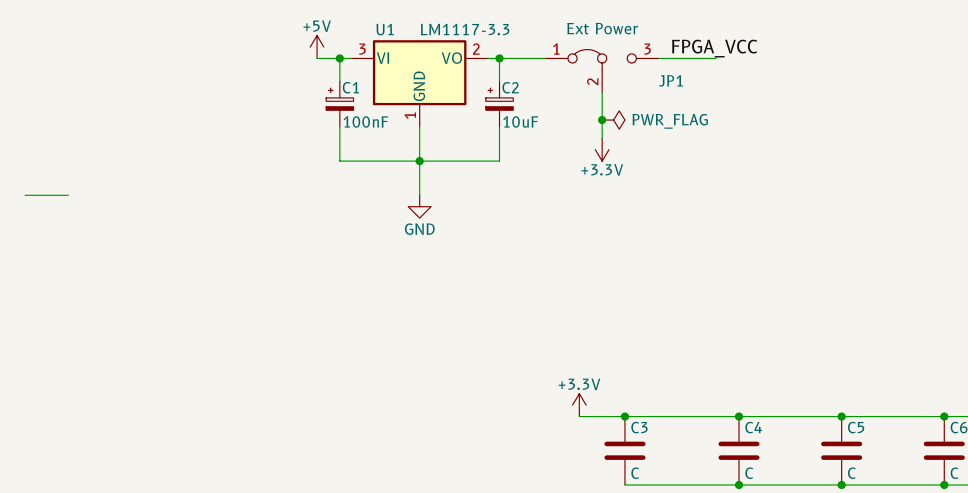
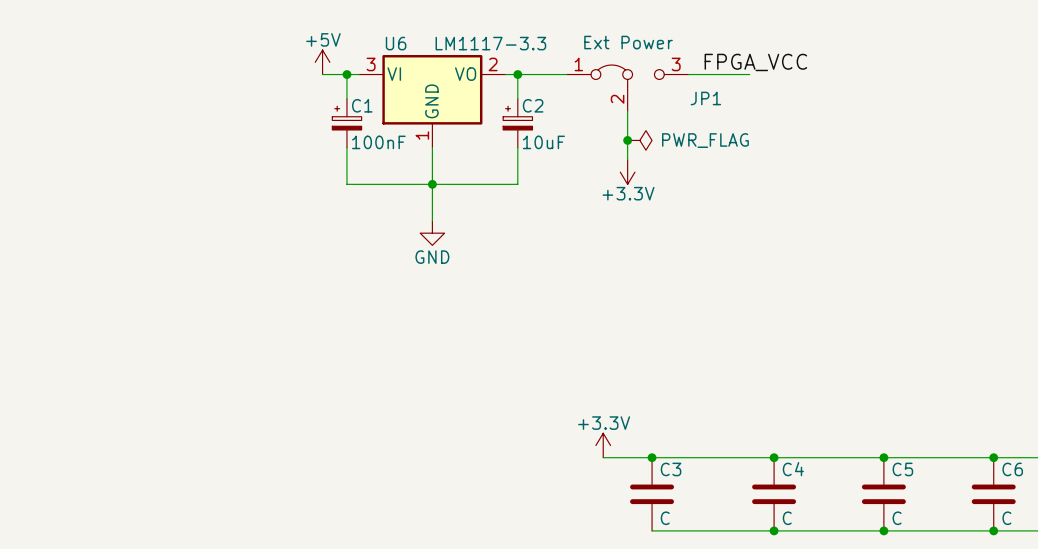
U1 name: U1 (385, 29) -> U6 (396, 43)
wire: (25, 195) (68, 195) -> none

